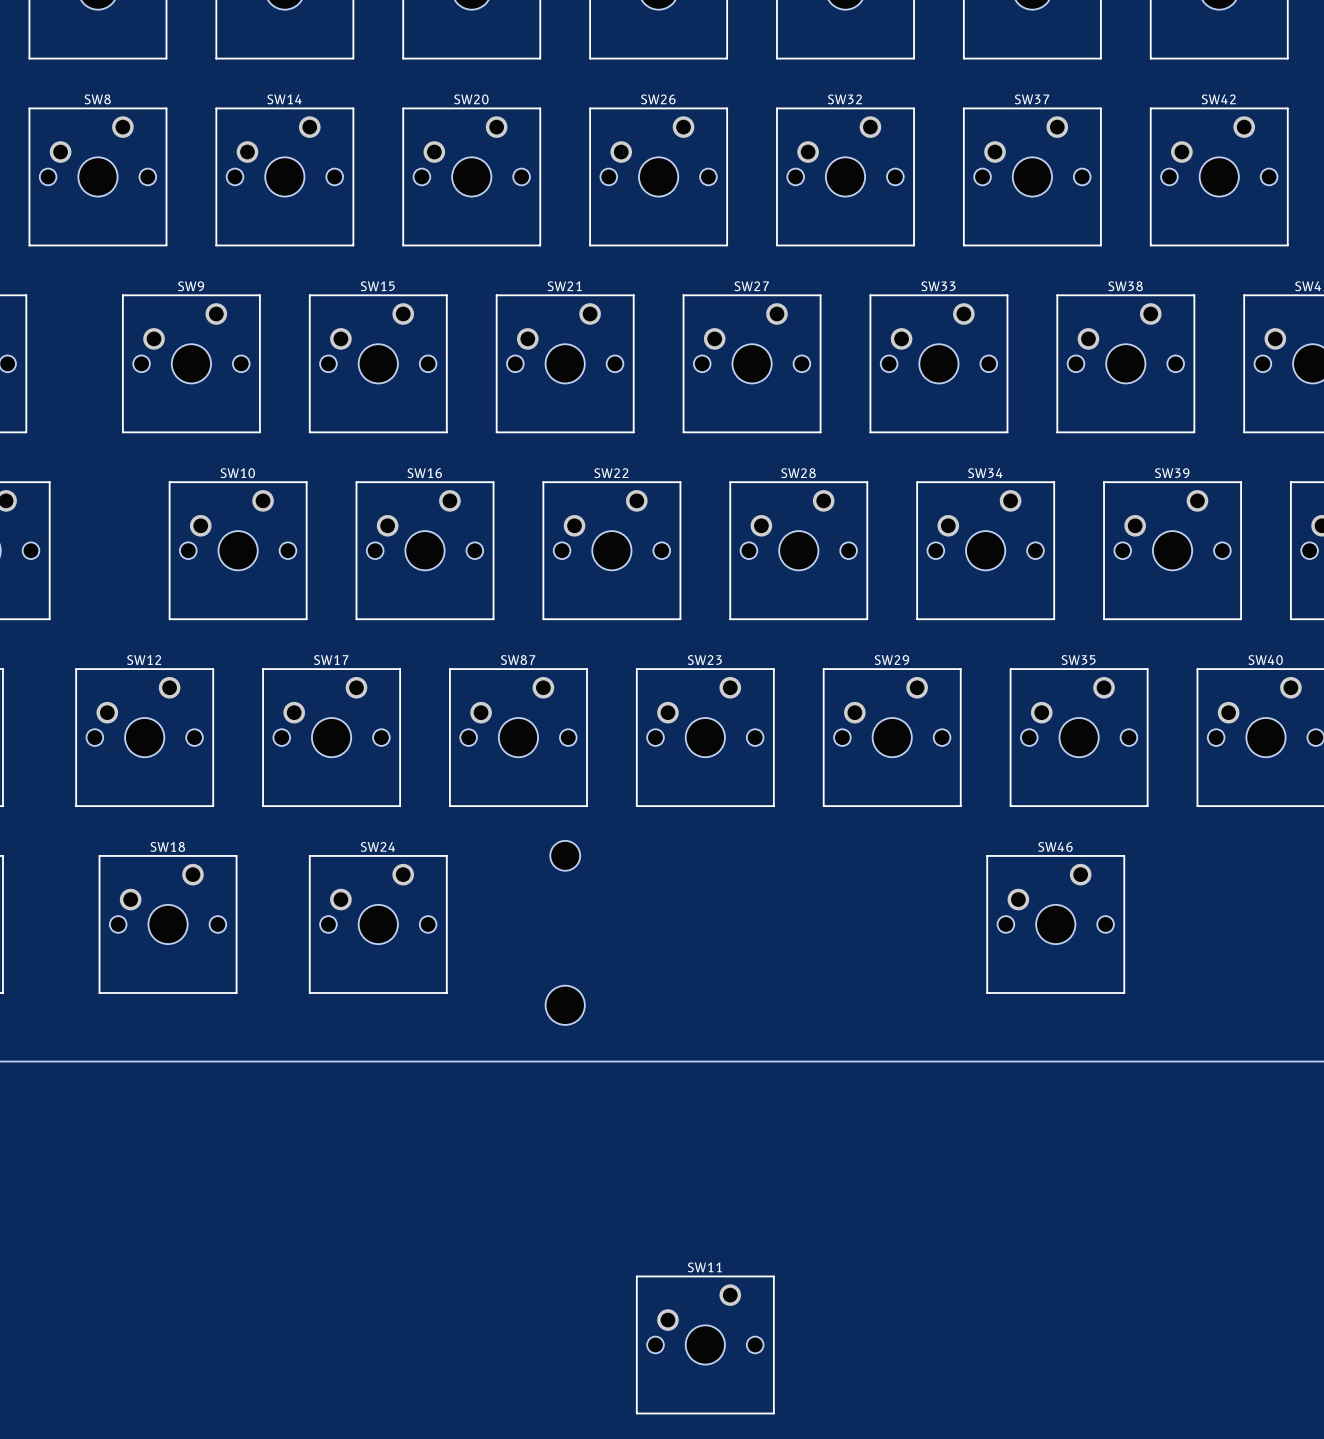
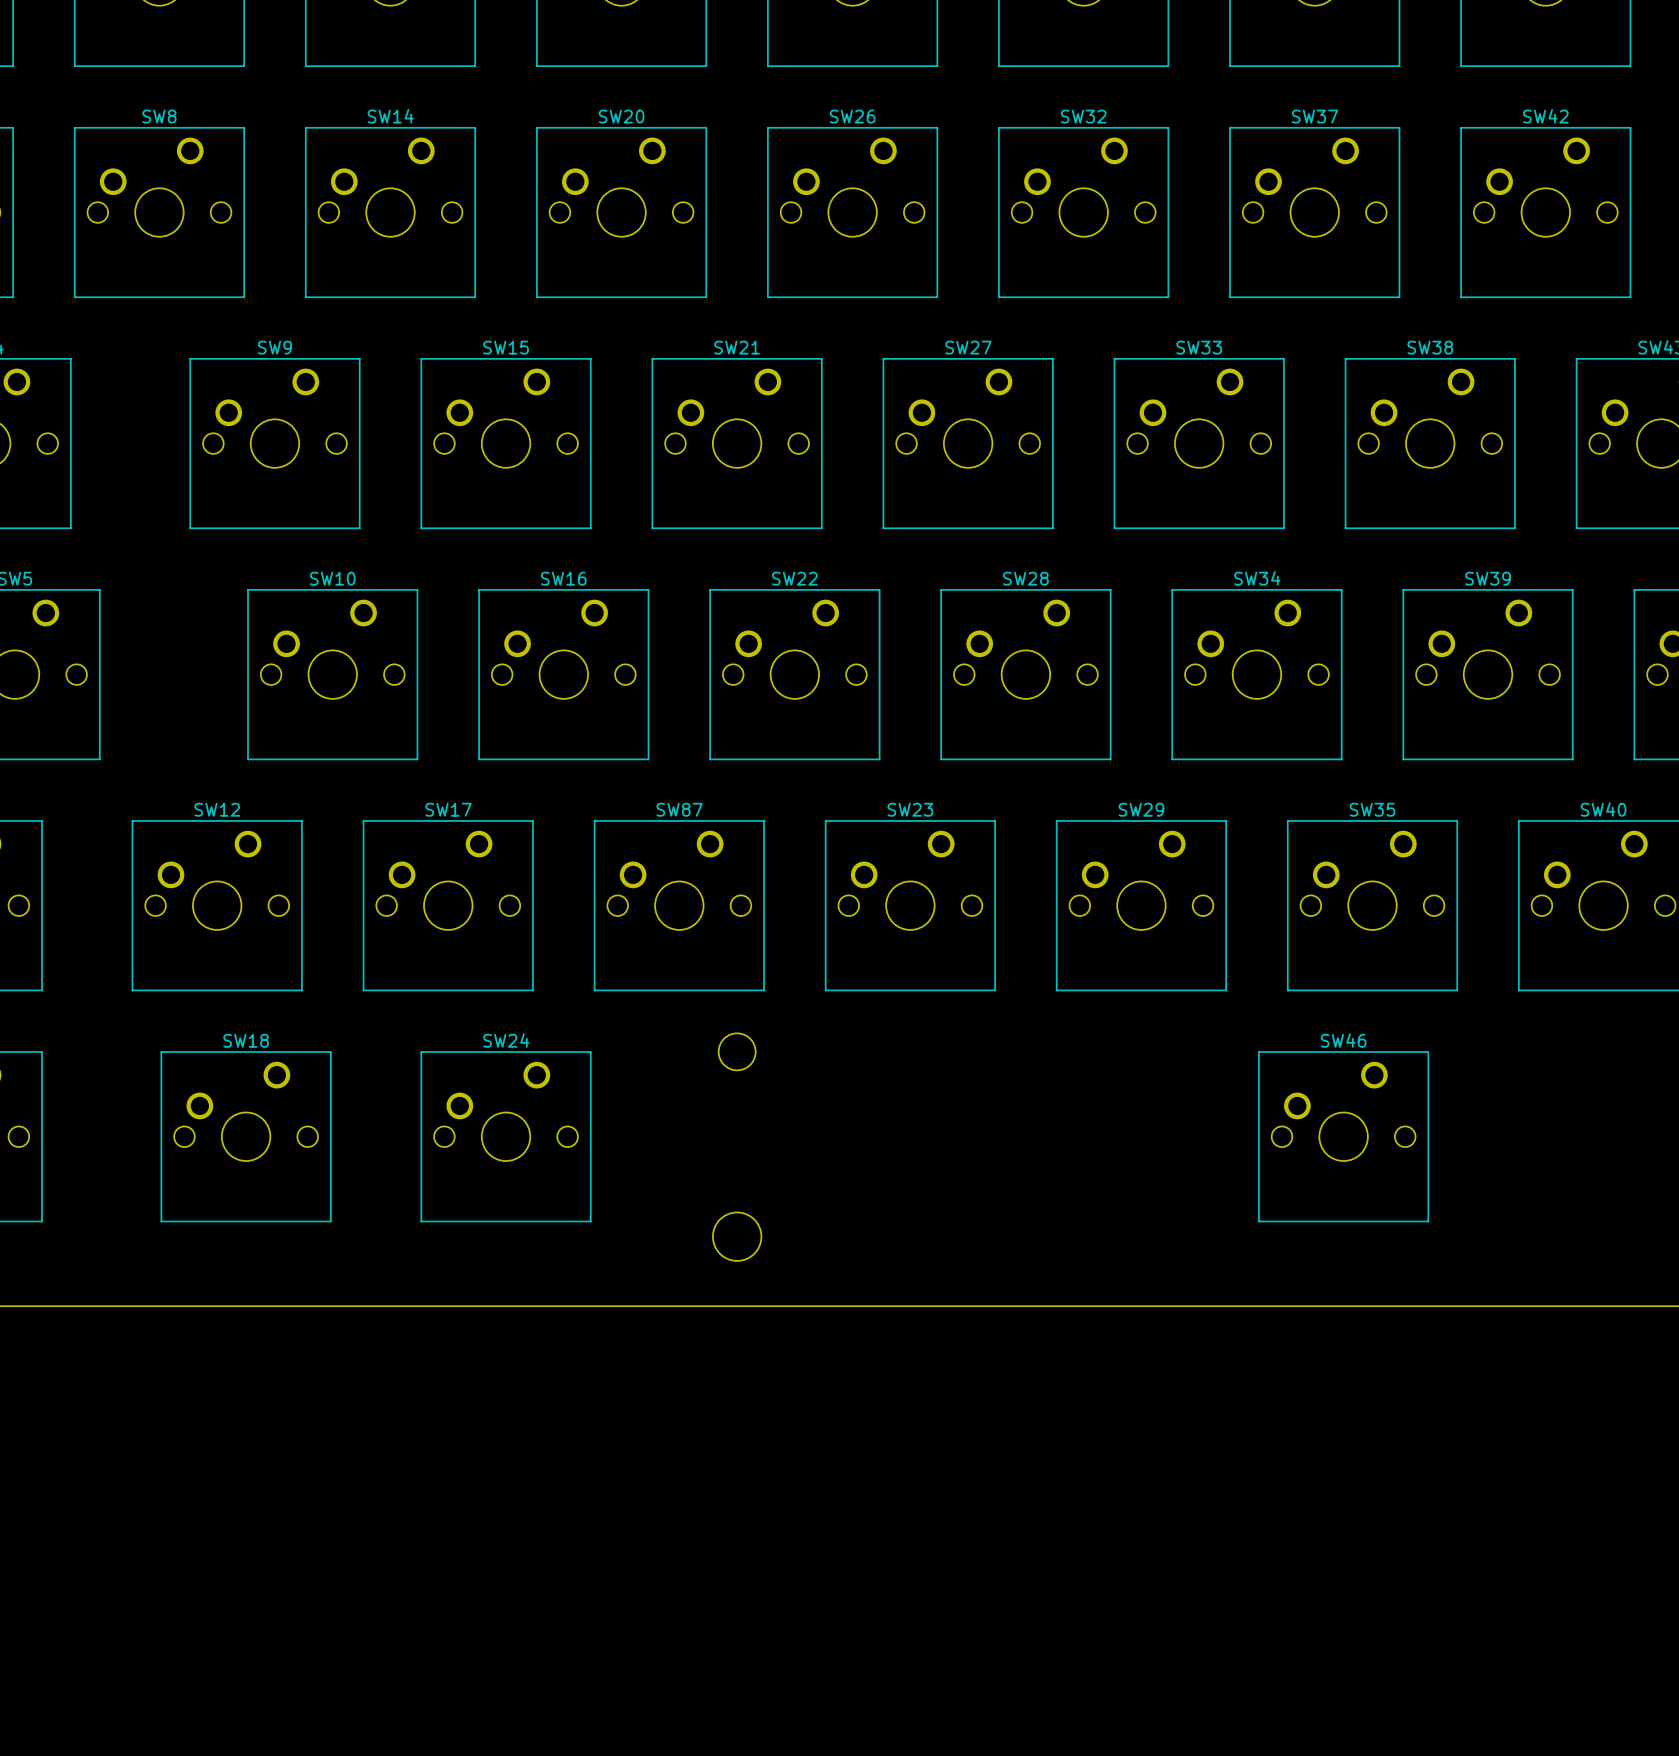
SW11: (705, 1344) -> none

